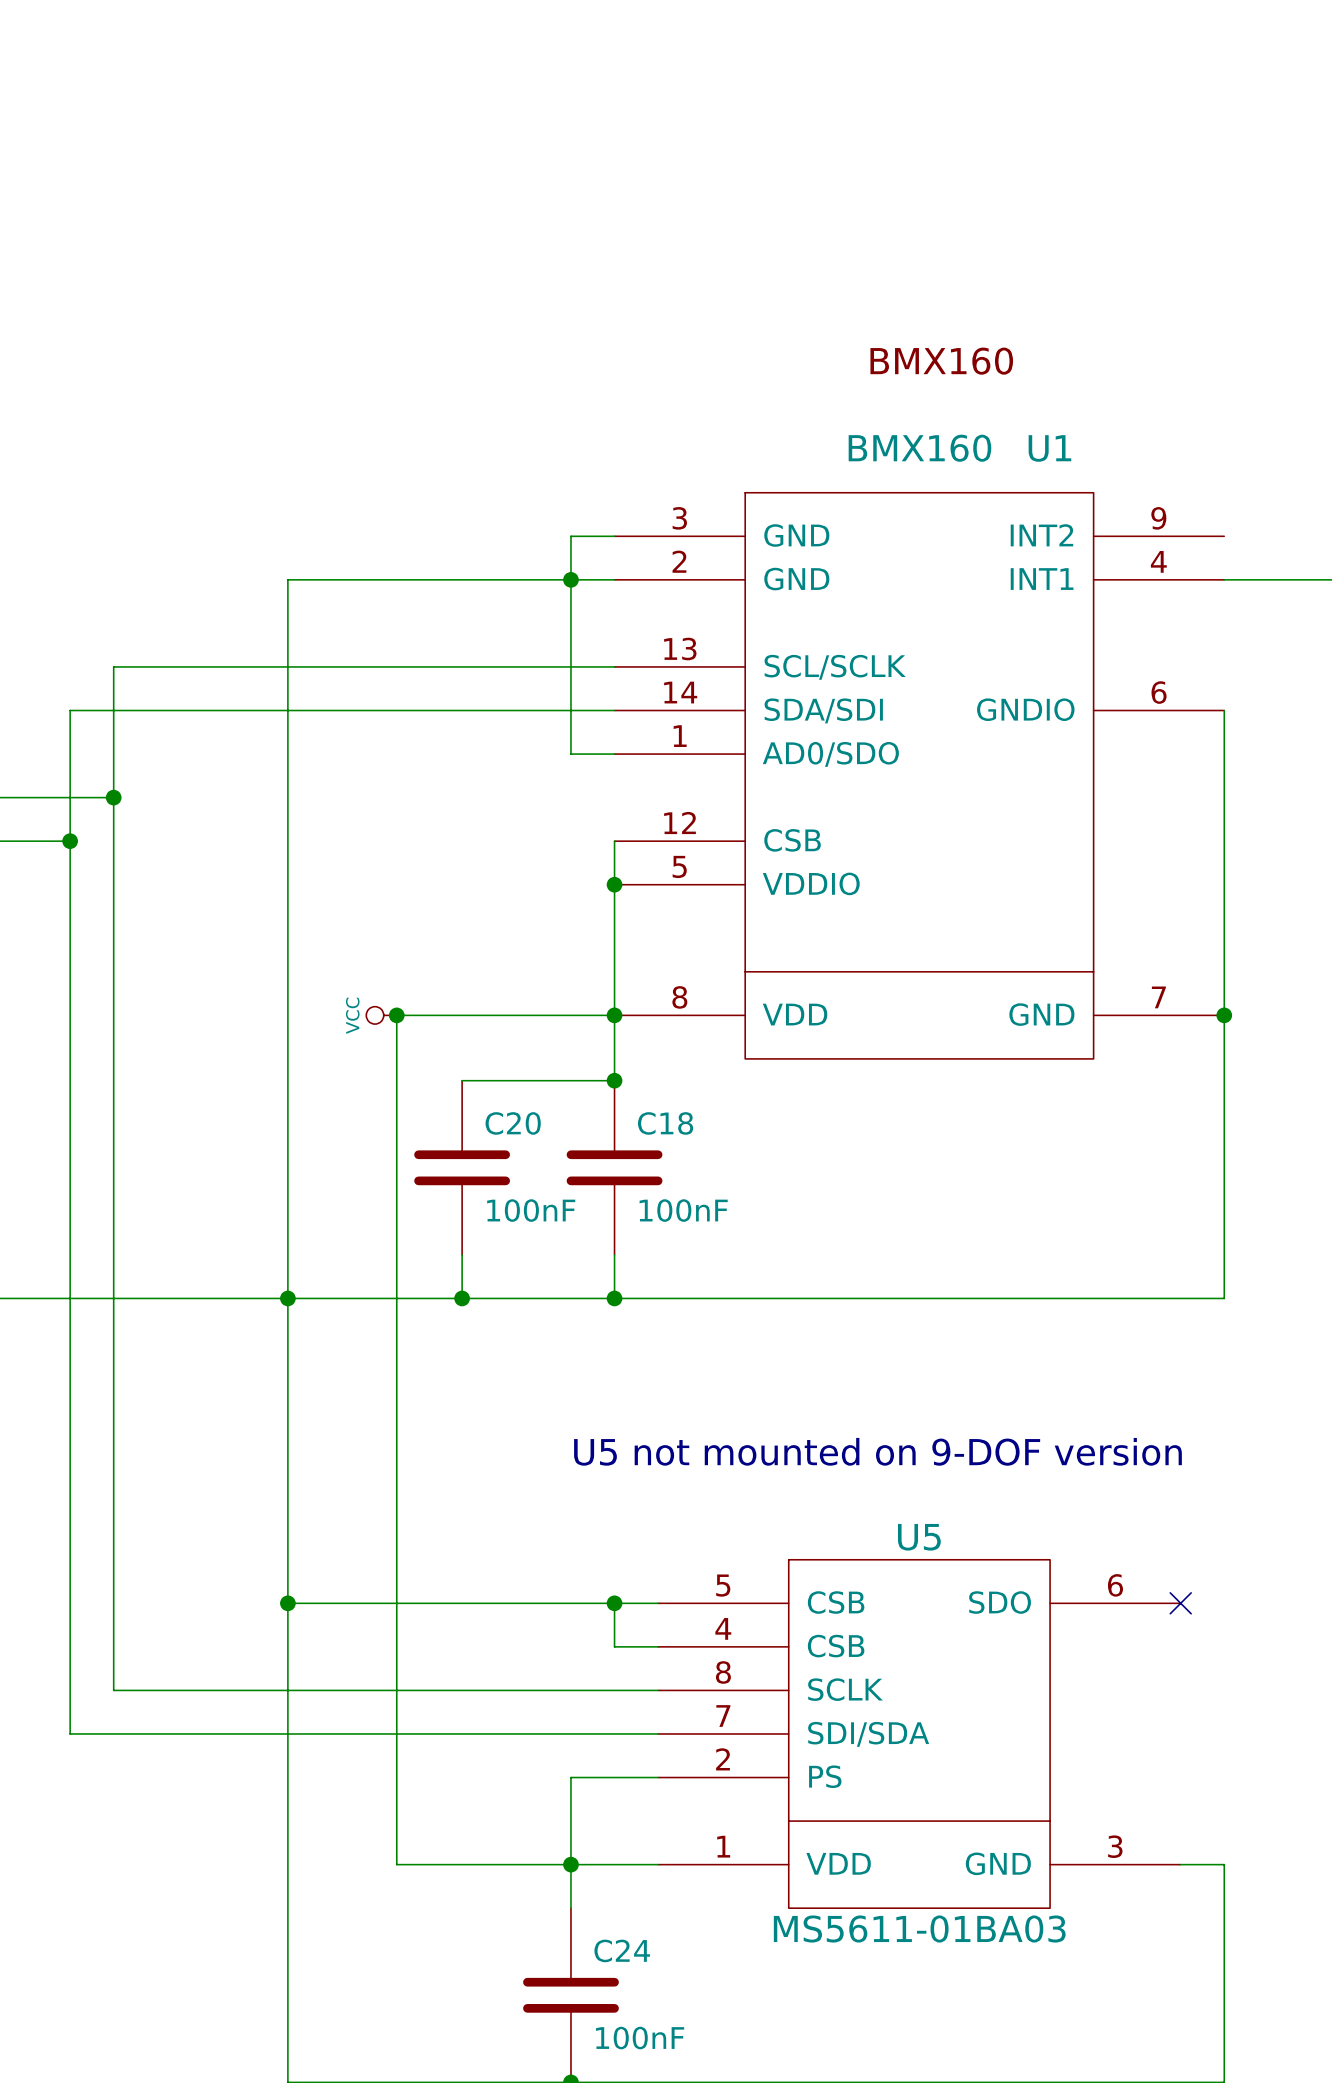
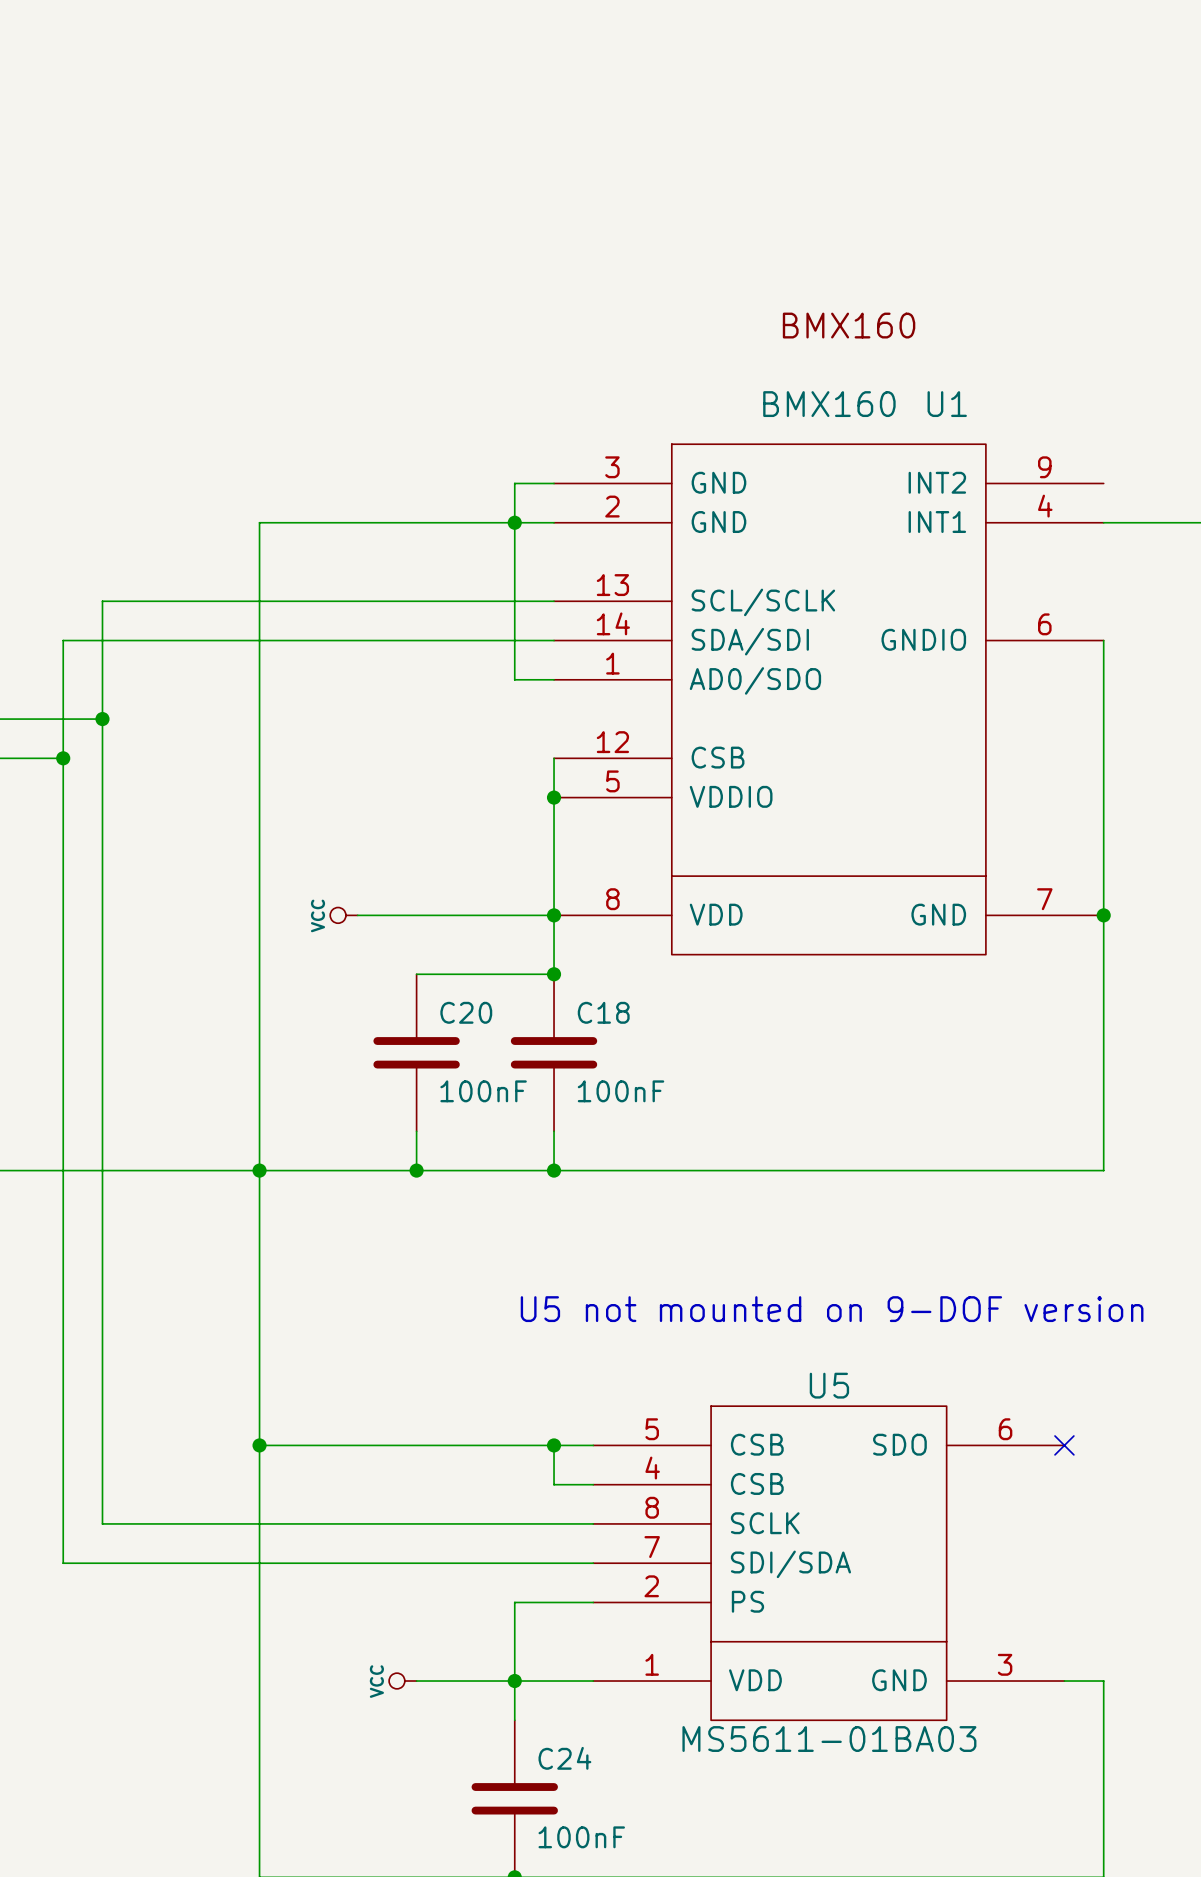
wire: (396, 1015) (396, 1864) (462, 1864) -> none
junction: (396, 1015) -> none
power symbol: none -> VCC (402, 1681)

